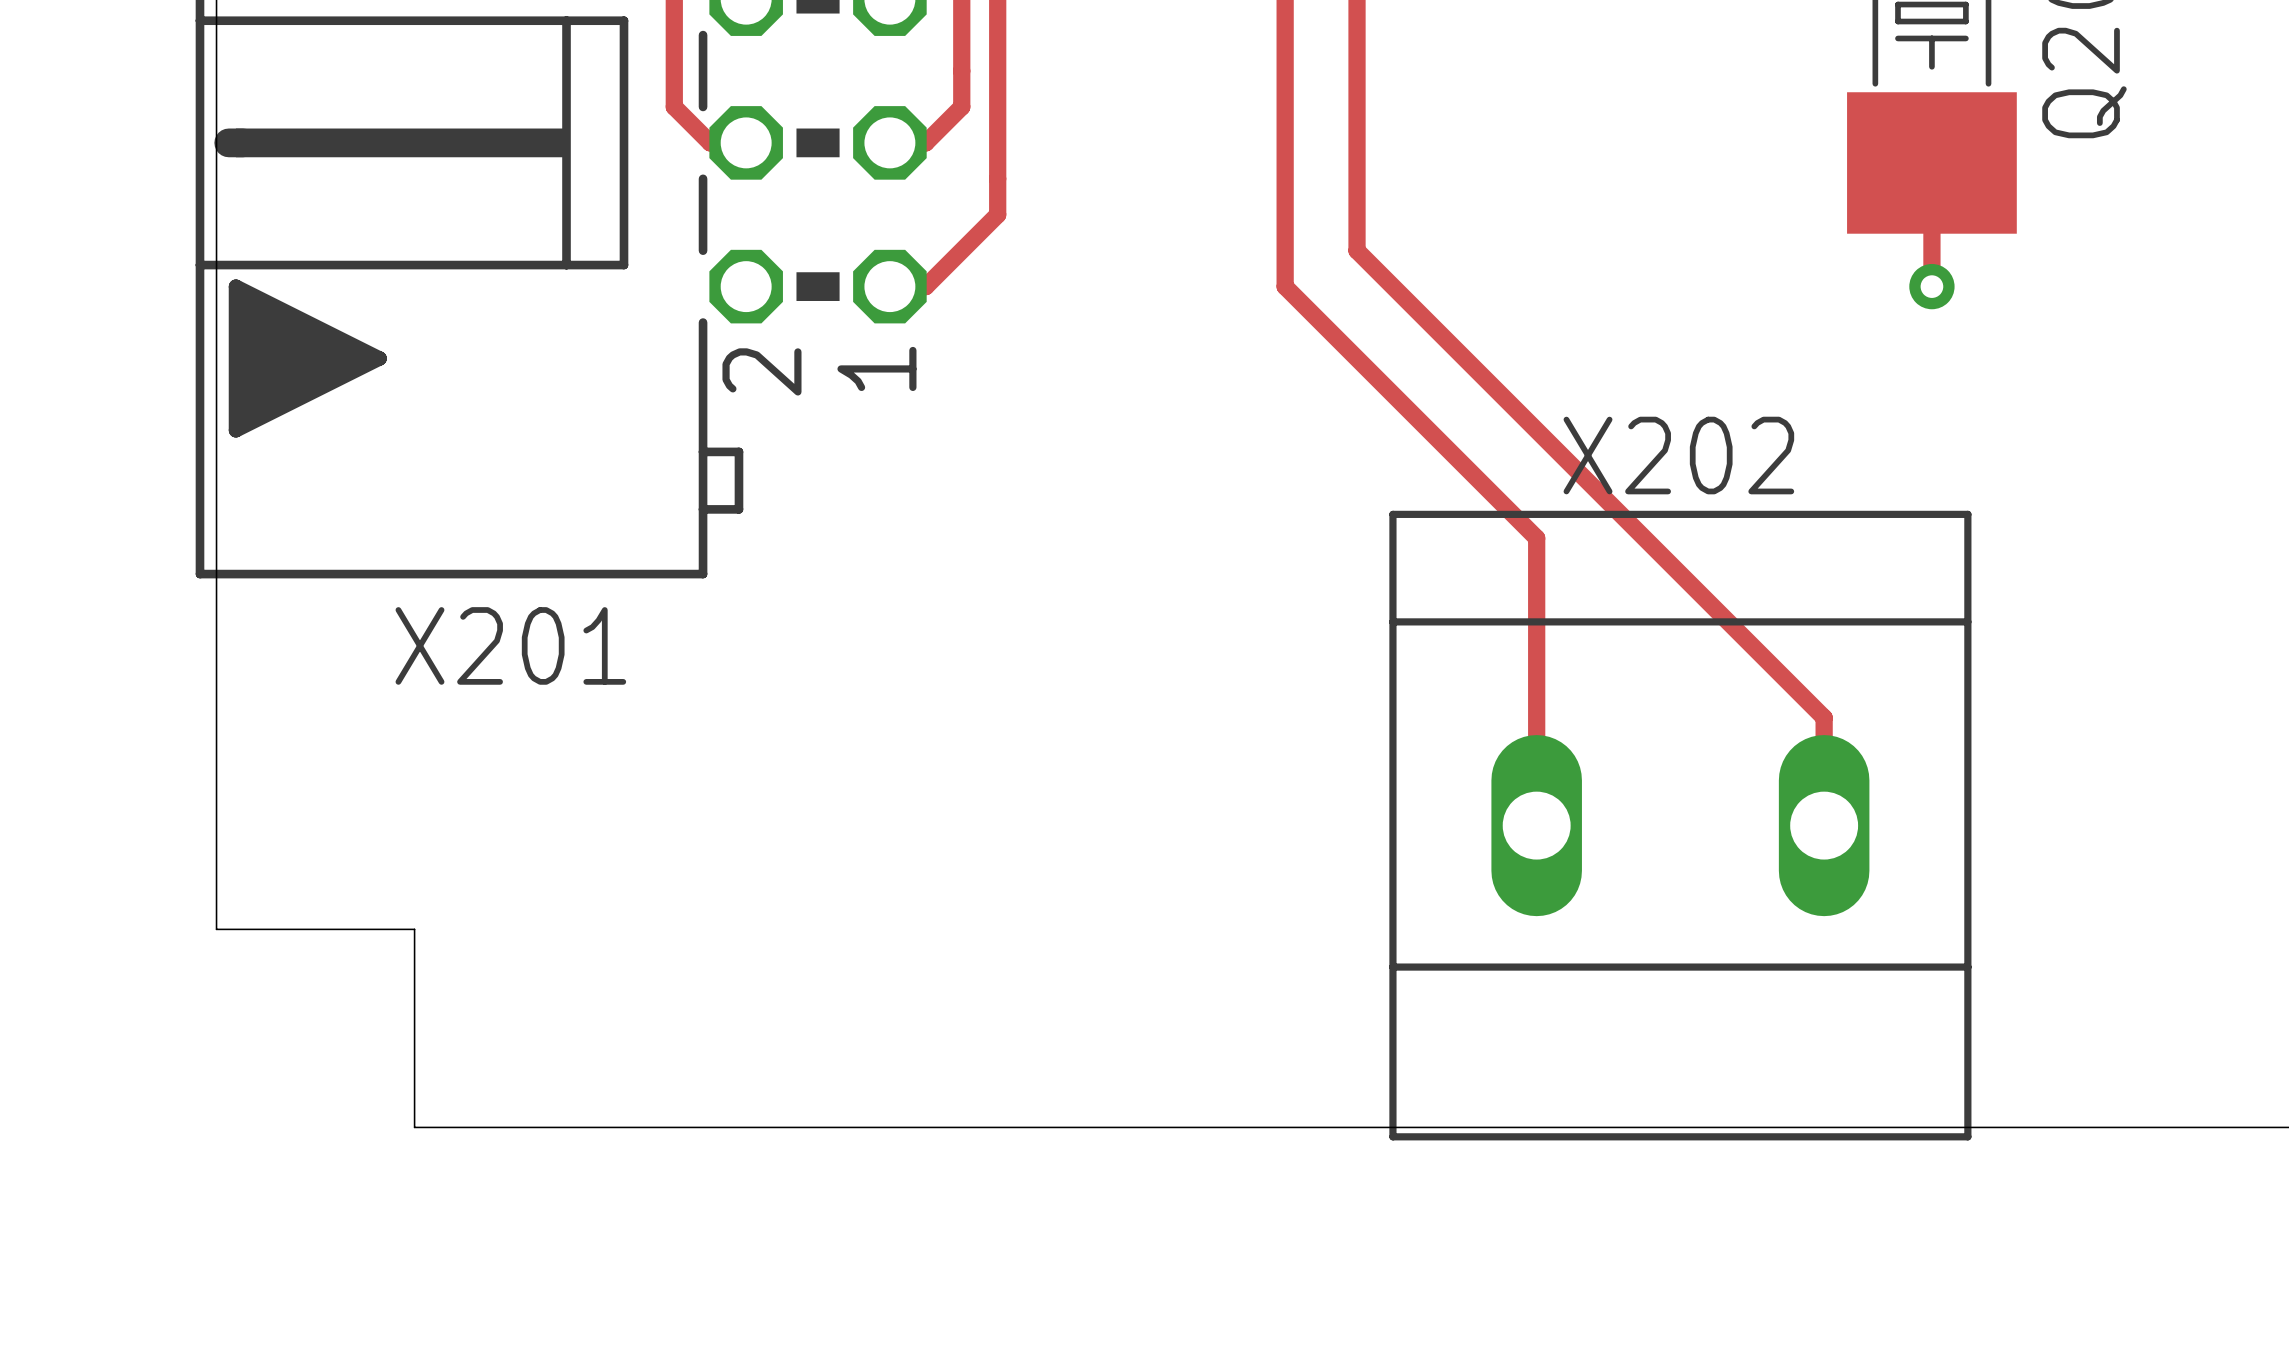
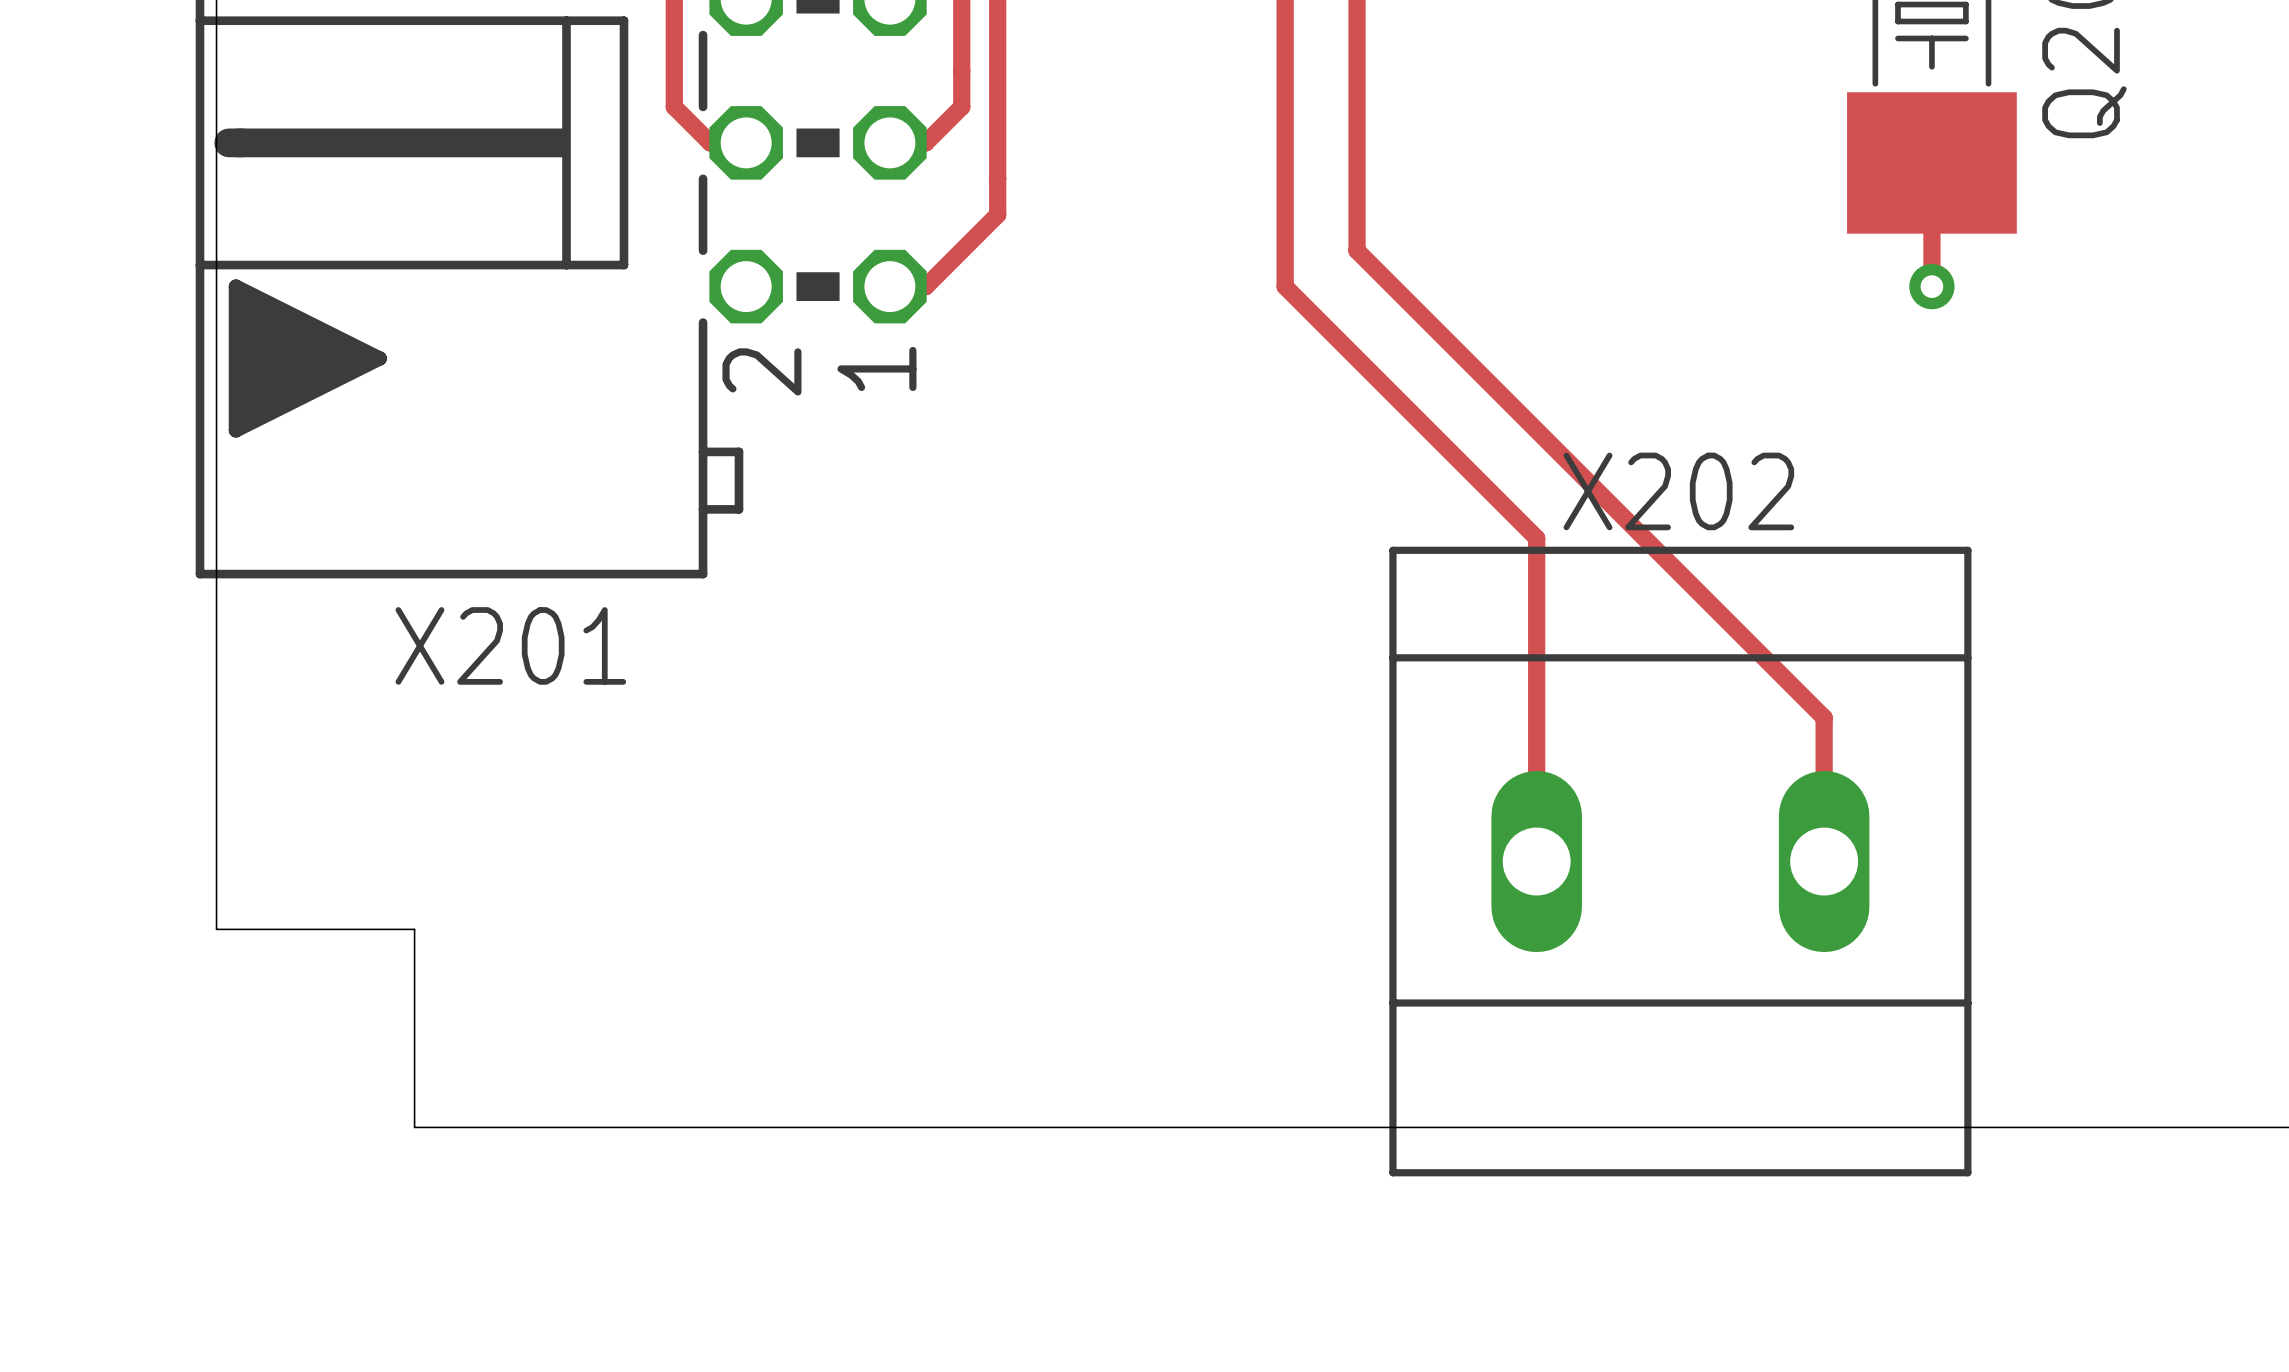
X202 position: (1680, 825) -> (1680, 861)

